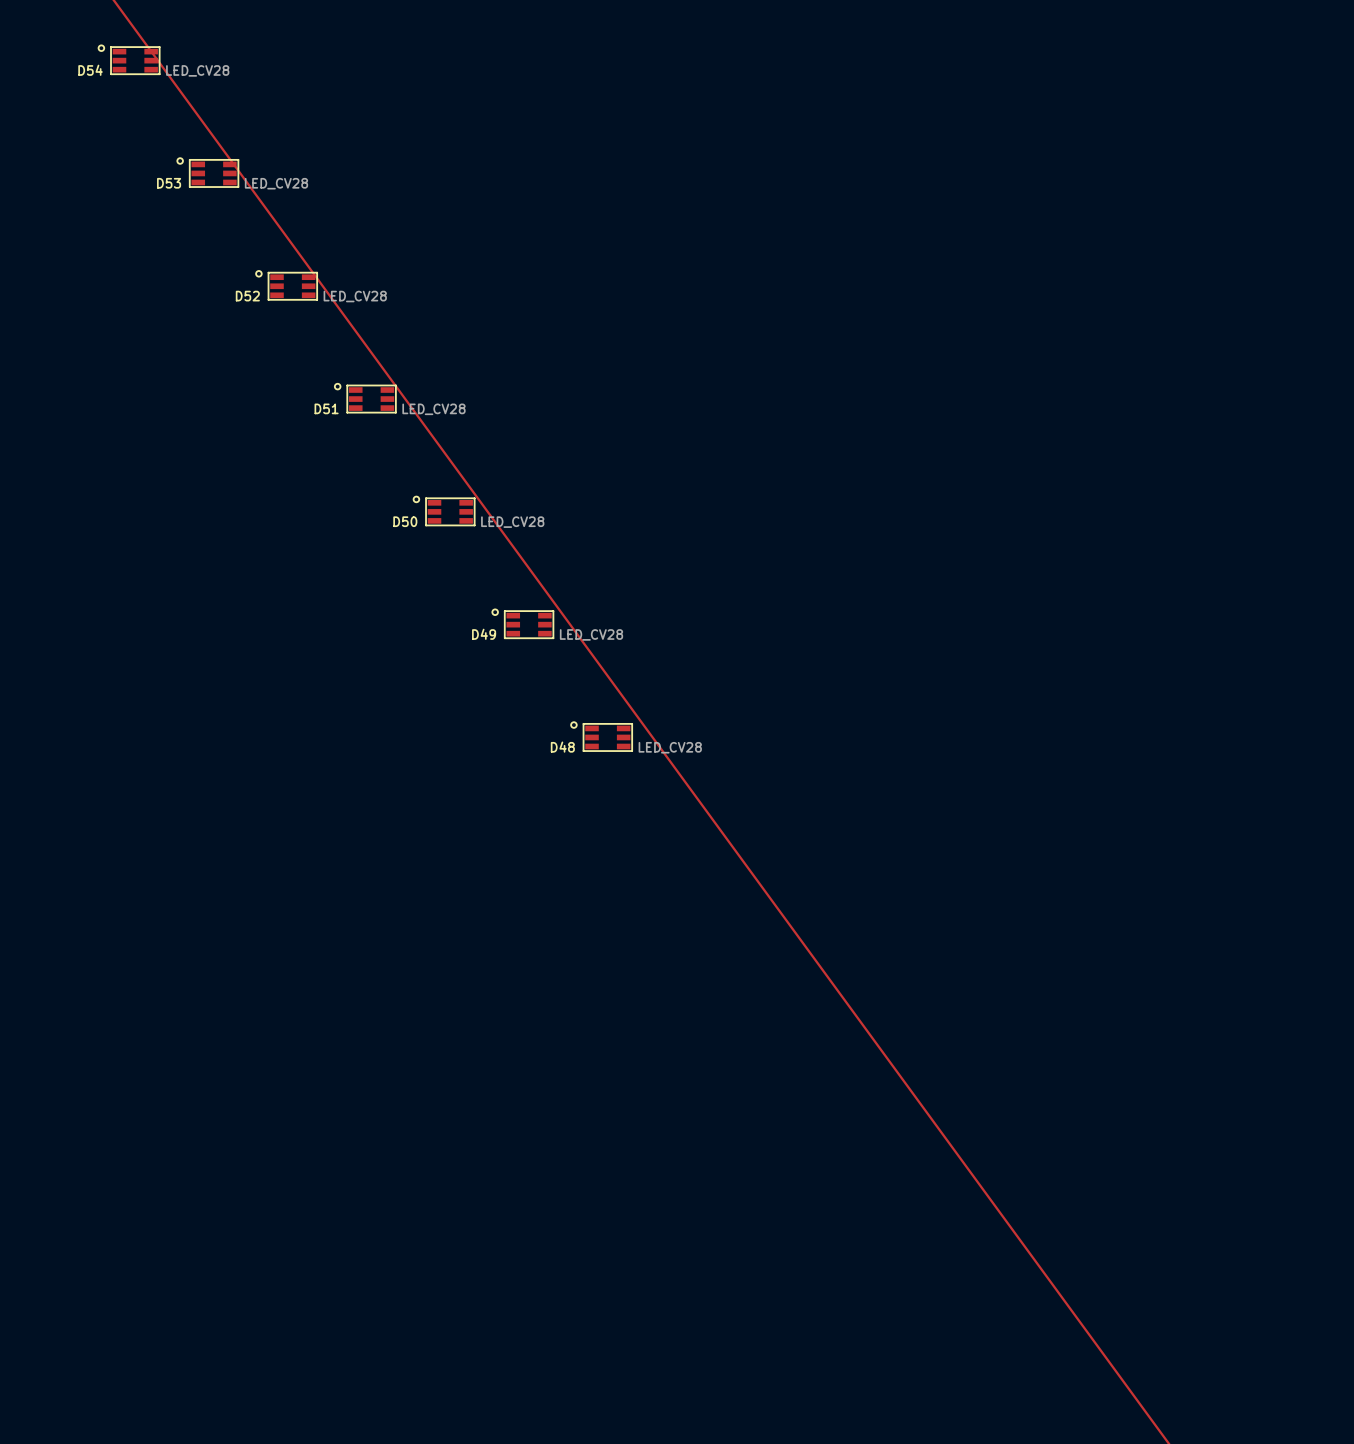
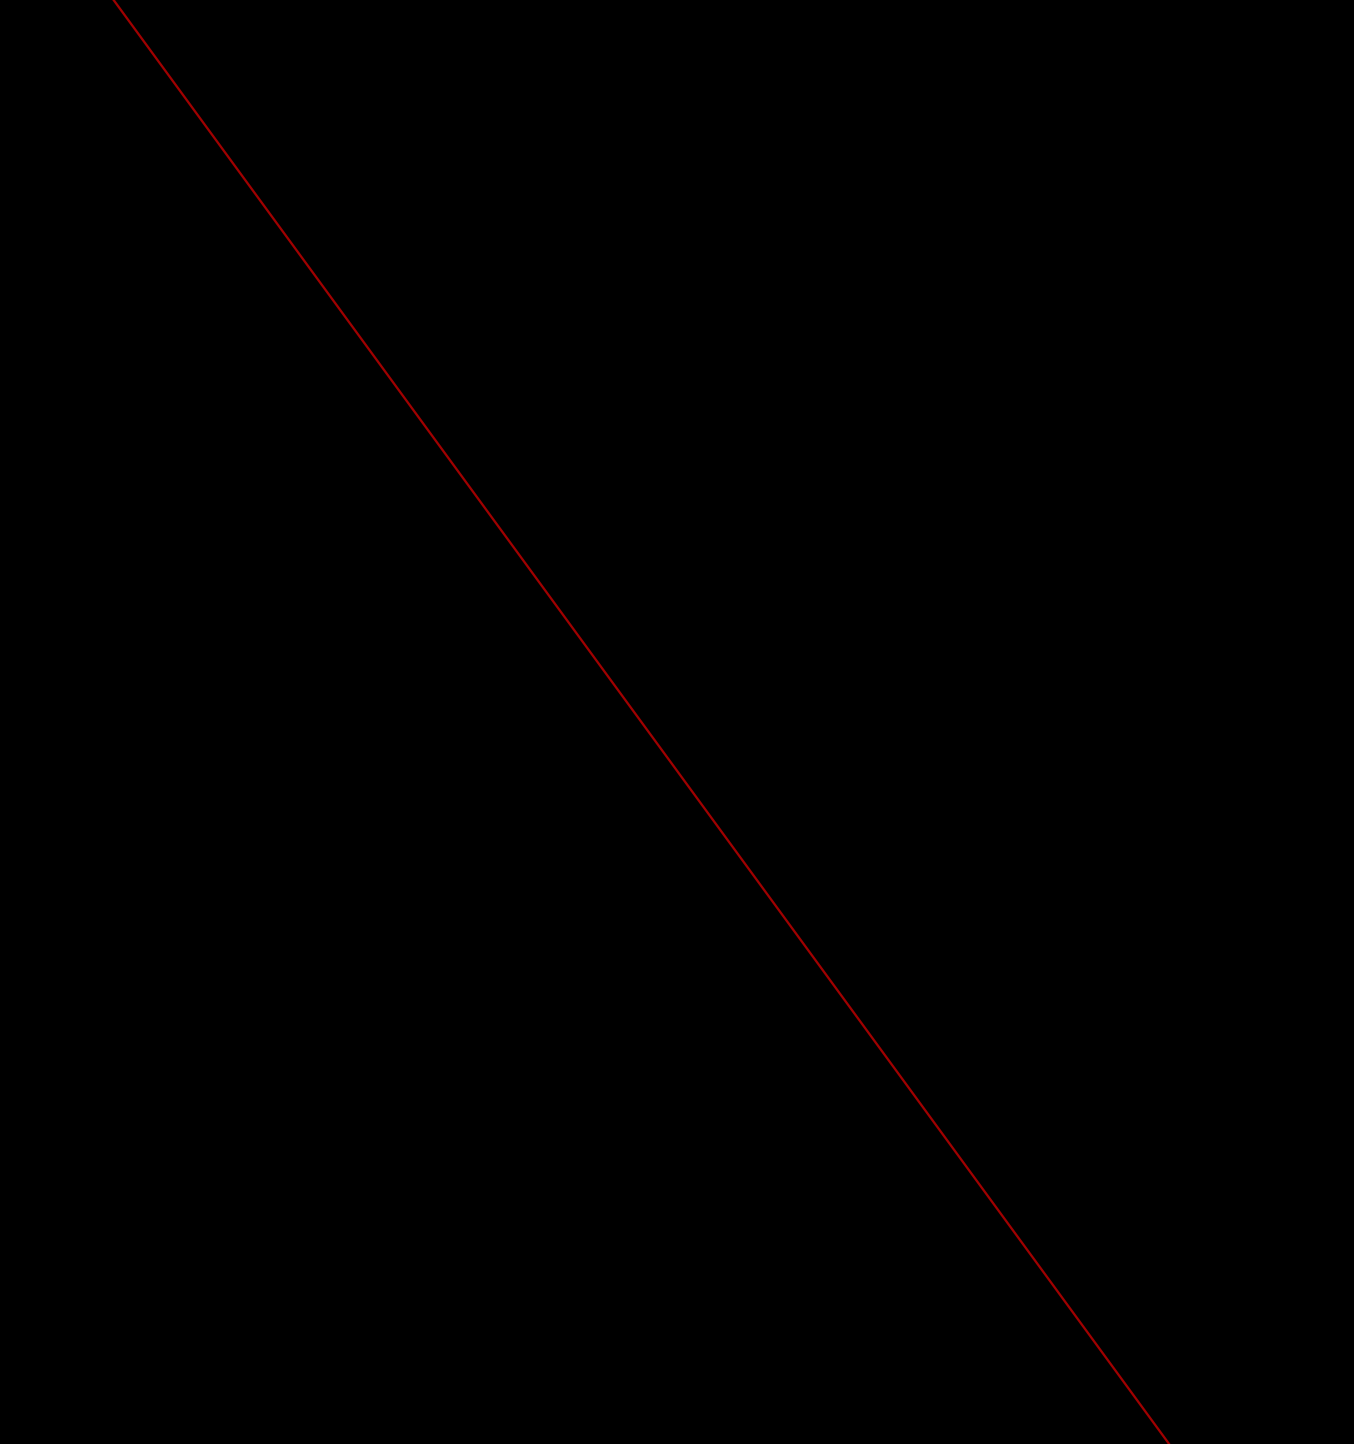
D54: LED_CV28 (129, 59) -> none
D53: LED_CV28 (208, 172) -> none
D52: LED_CV28 (286, 285) -> none
D51: LED_CV28 (365, 398) -> none
D50: LED_CV28 (444, 511) -> none
D49: LED_CV28 (523, 623) -> none
D48: LED_CV28 (601, 736) -> none

